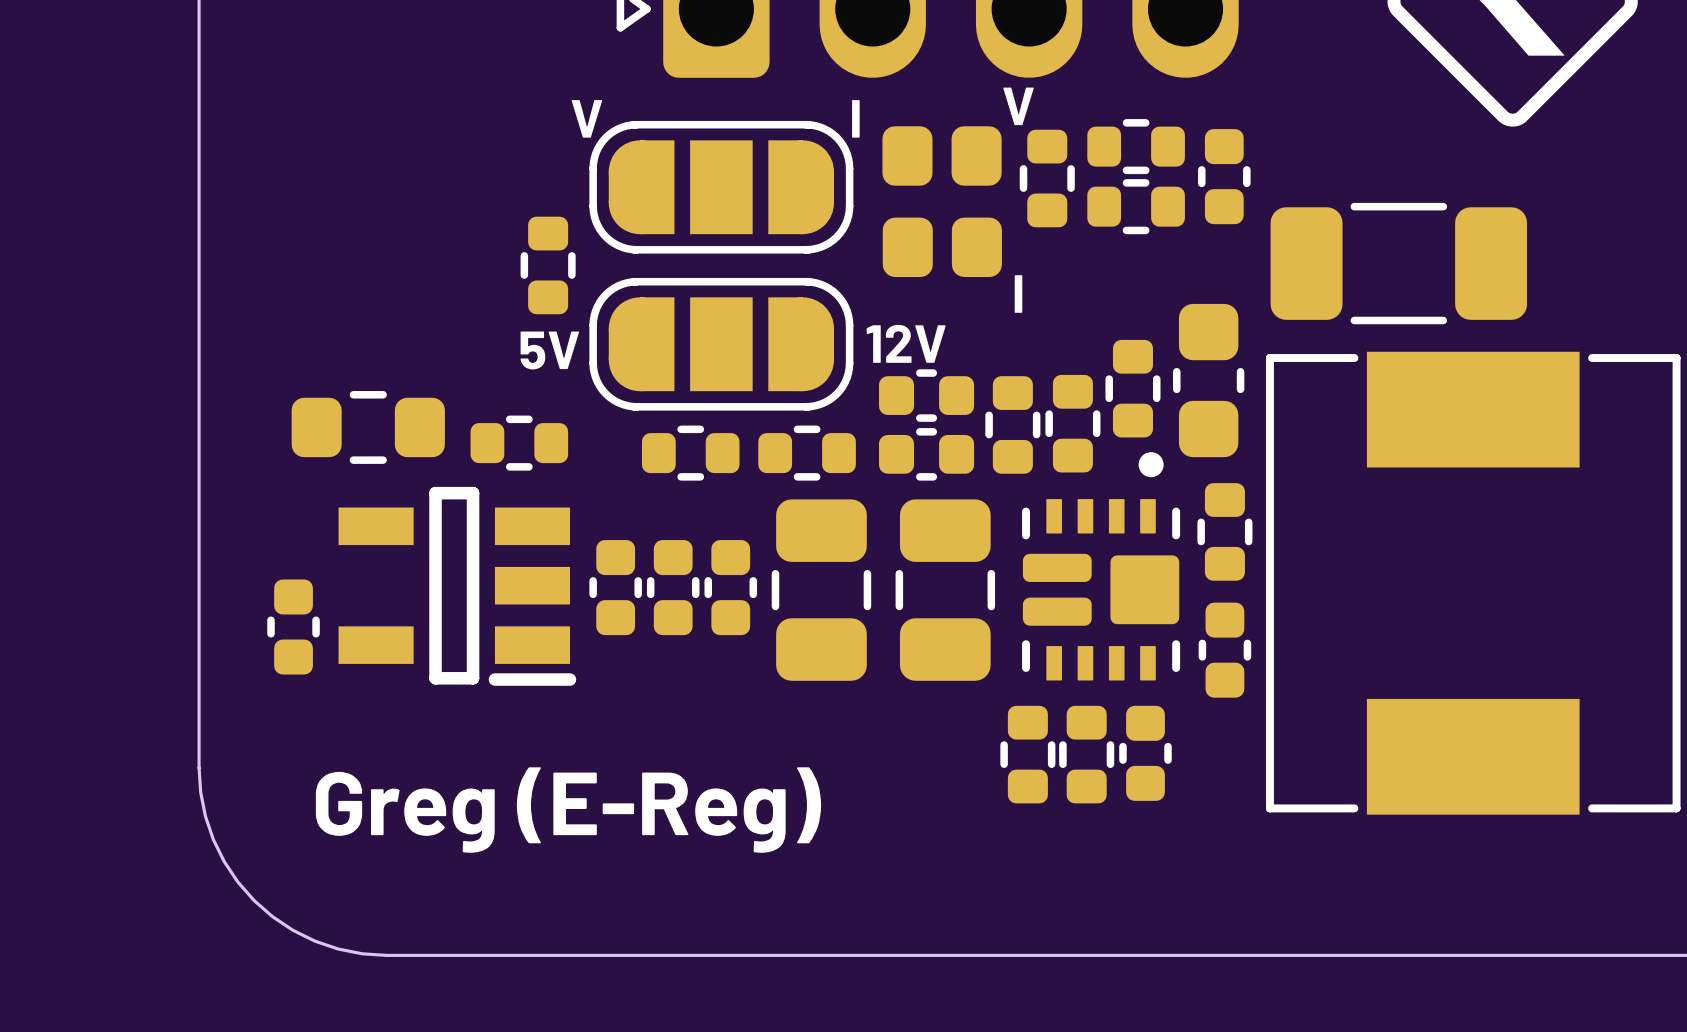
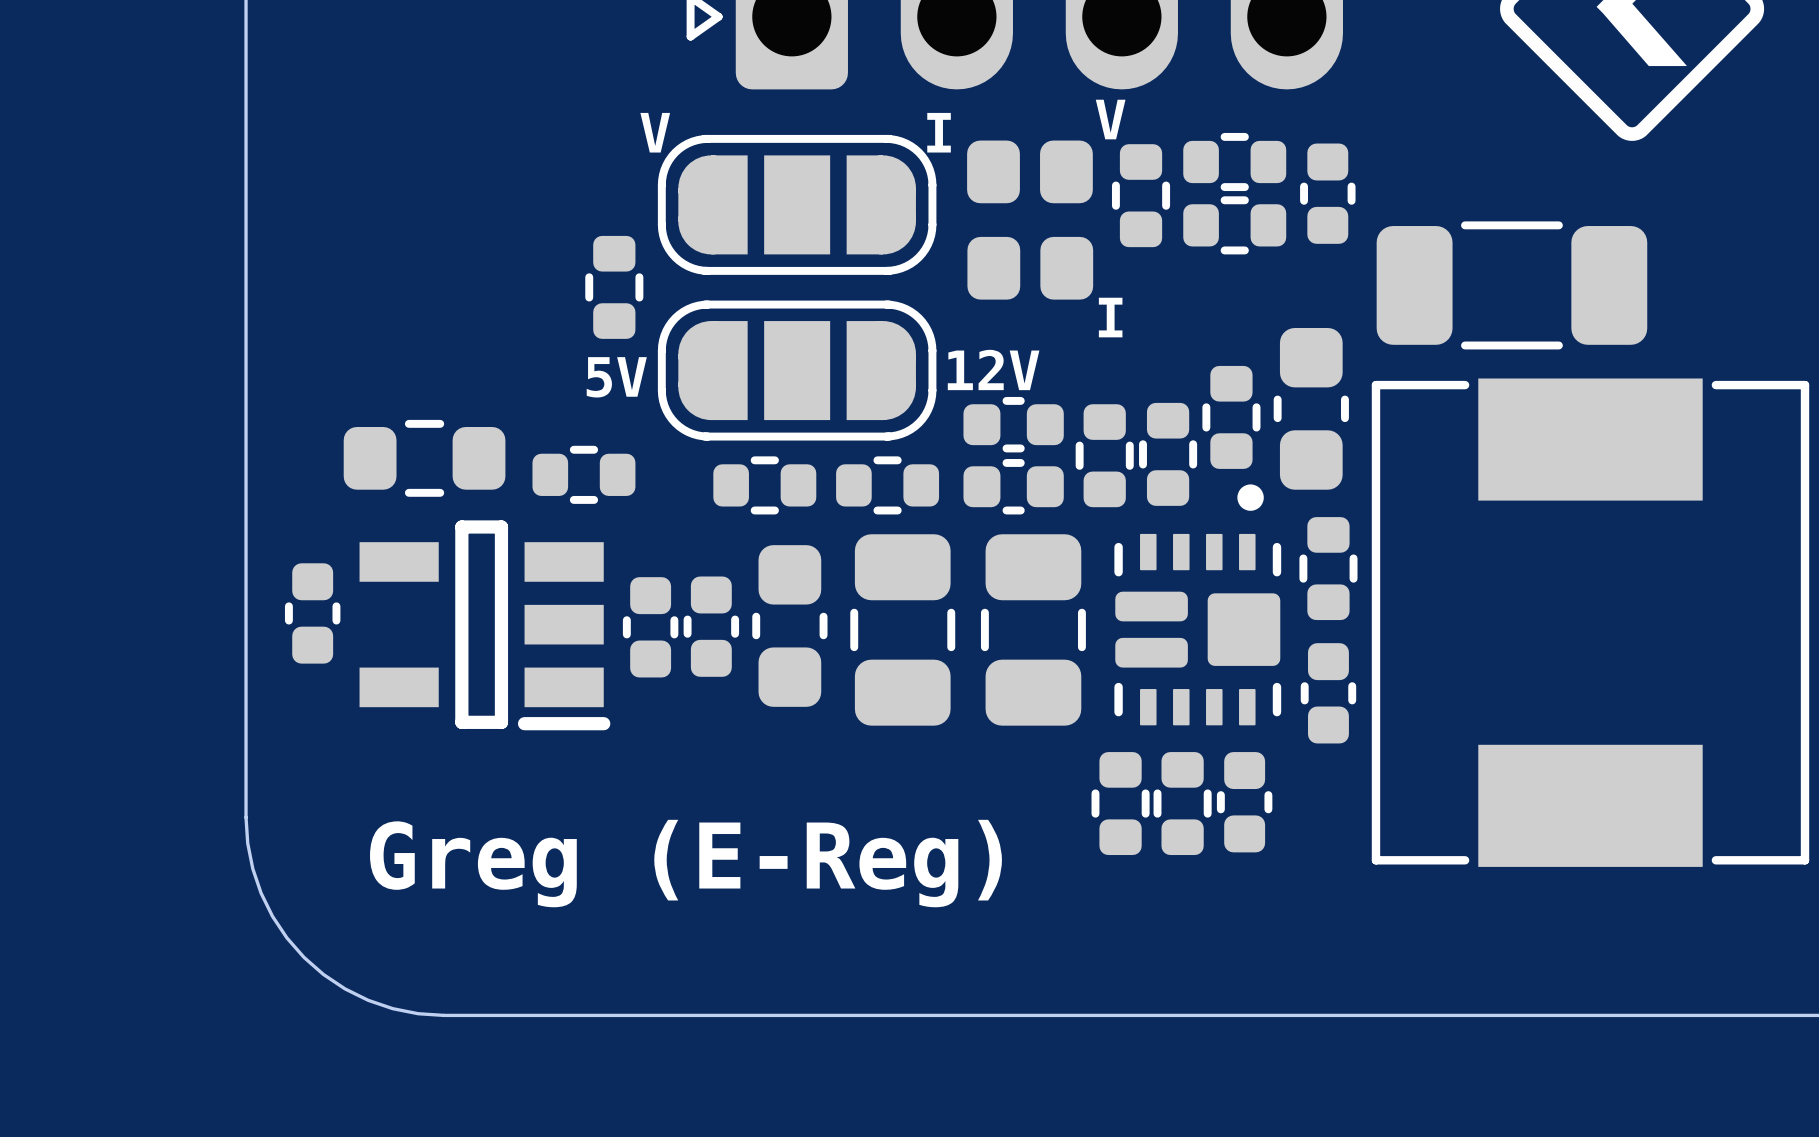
part footprint: [704, 540, 758, 636] -> [752, 545, 828, 707]
part position: (457, 586) -> (484, 625)
part: none -> (711, 626)
part: none -> (650, 627)
part: (615, 587) -> none
part: (673, 587) -> none
part position: (293, 627) -> (312, 613)

